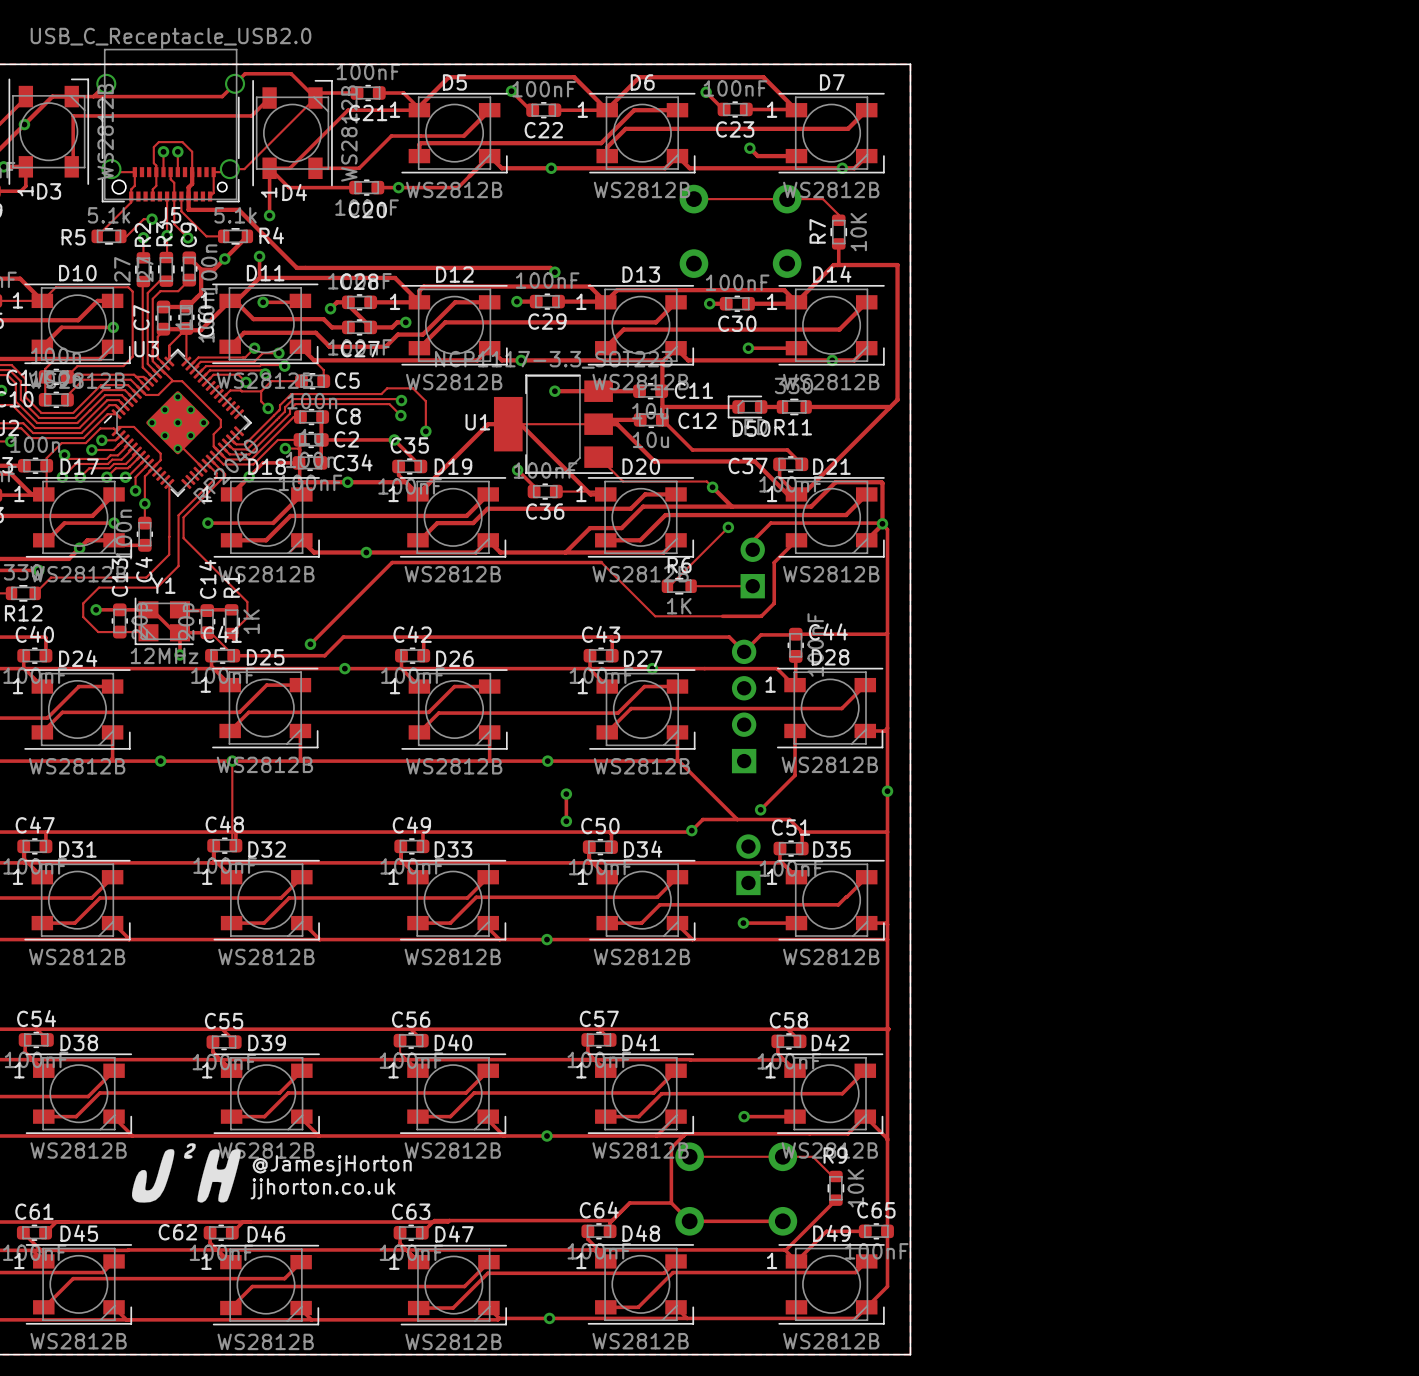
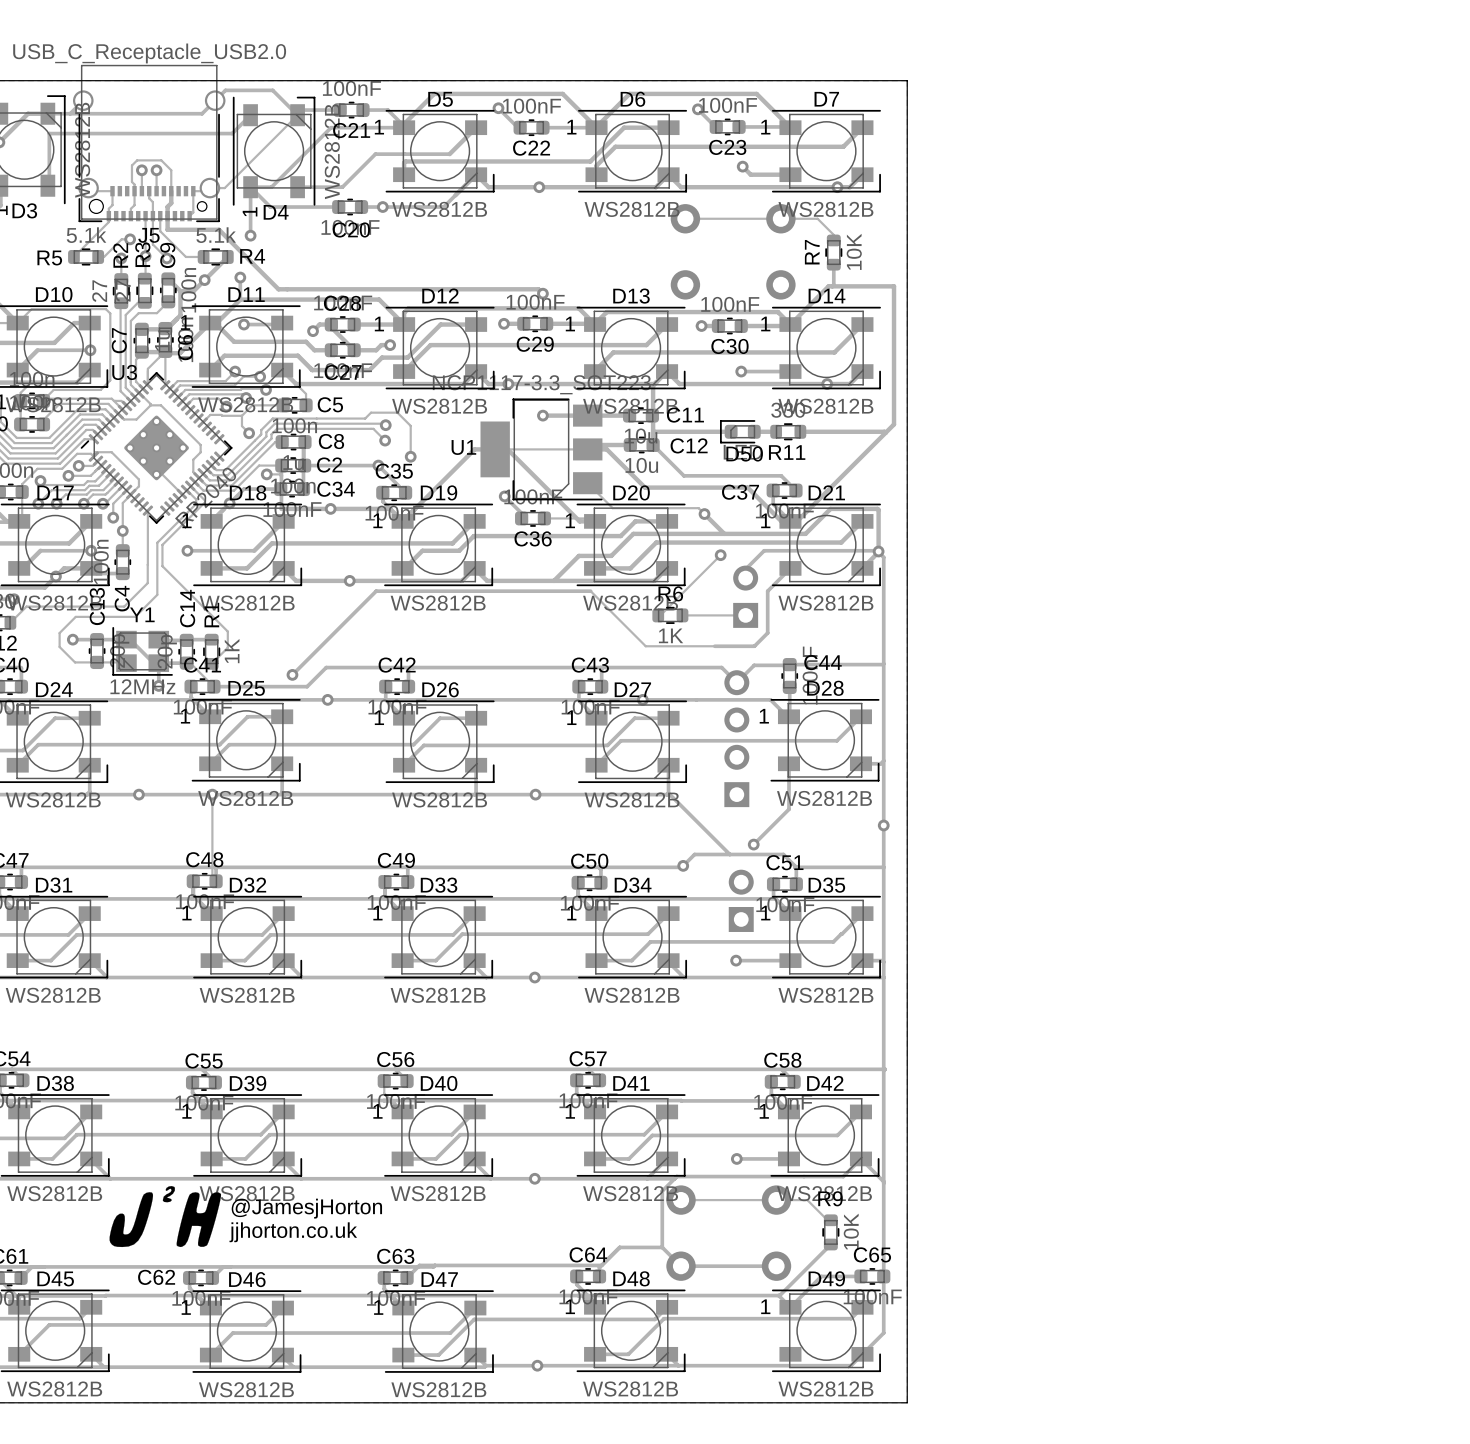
track: (566, 794) (566, 821) -> none
via: (566, 794) -> none
via: (566, 821) -> none

